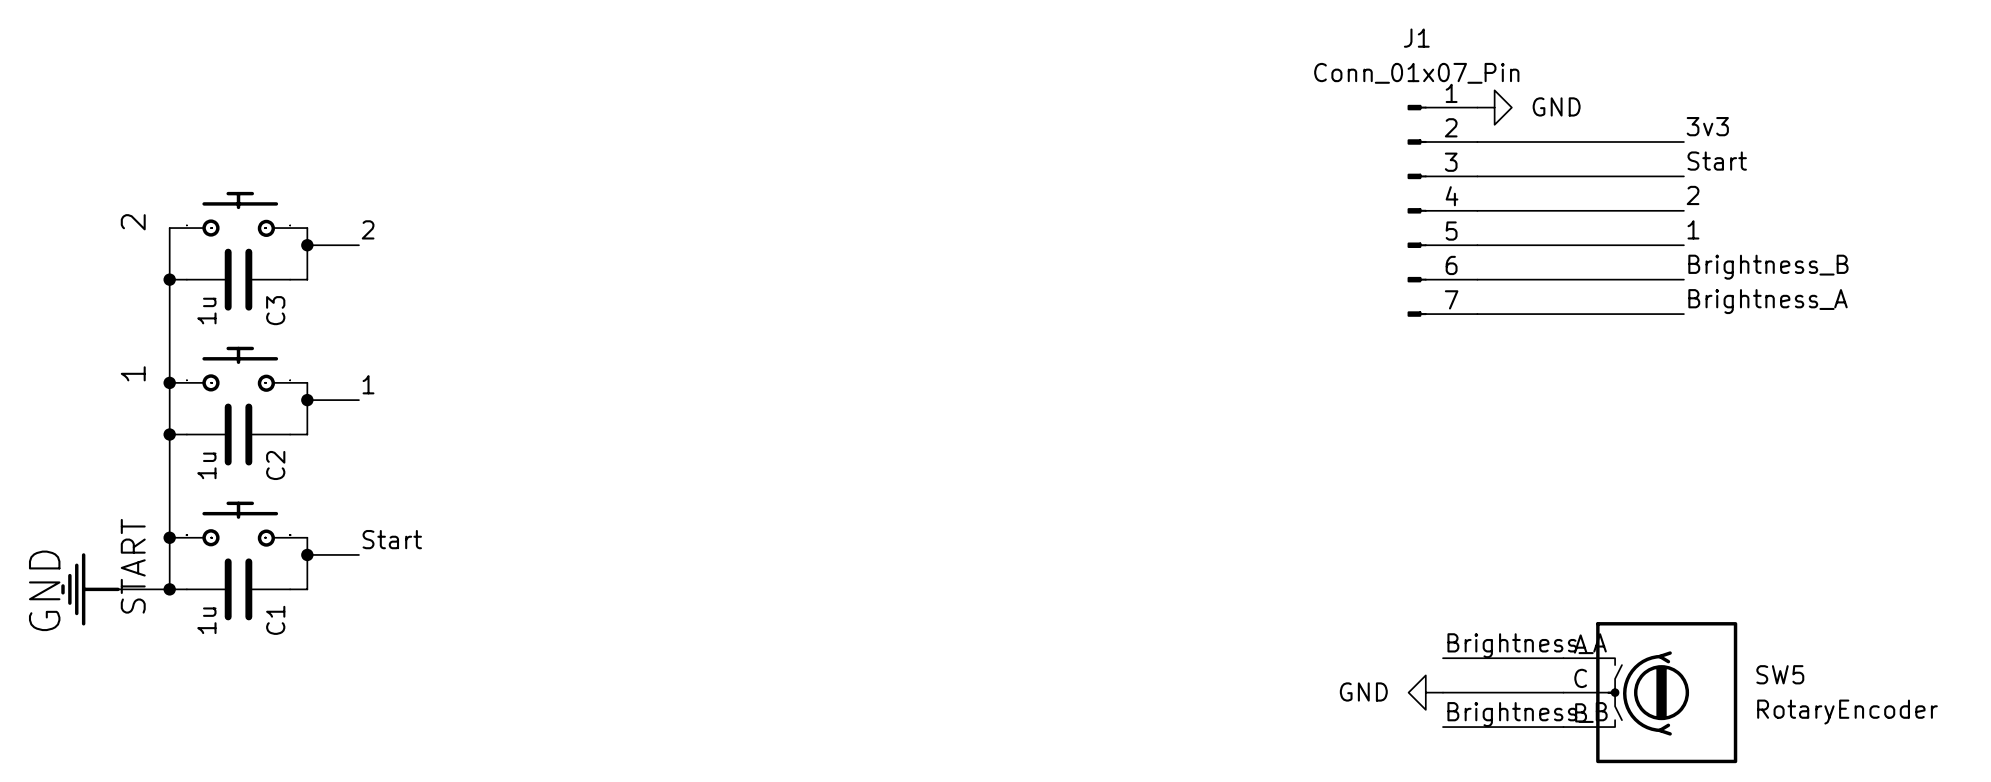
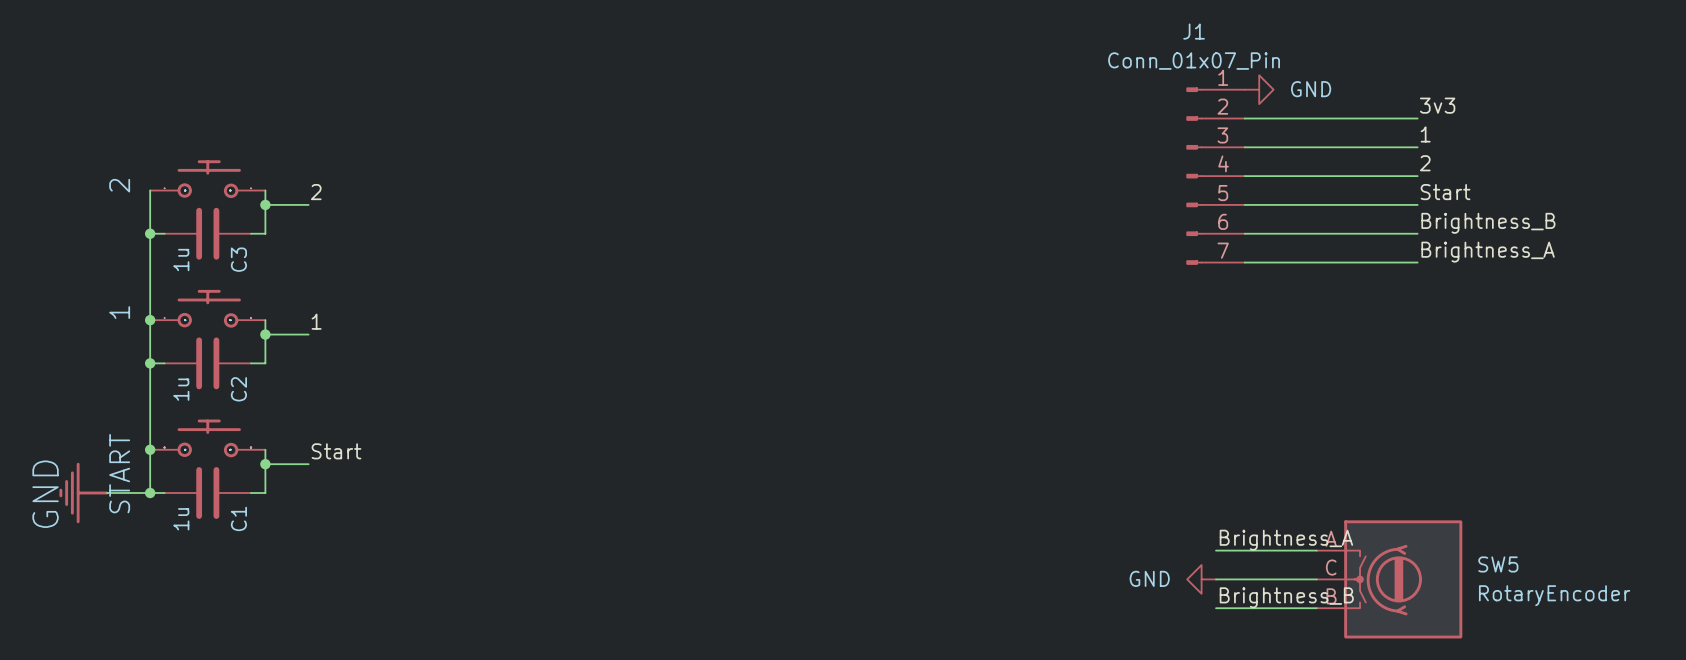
label: Start (1717, 161) -> 1 (1425, 134)
label: 1 (1693, 229) -> Start (1445, 192)

